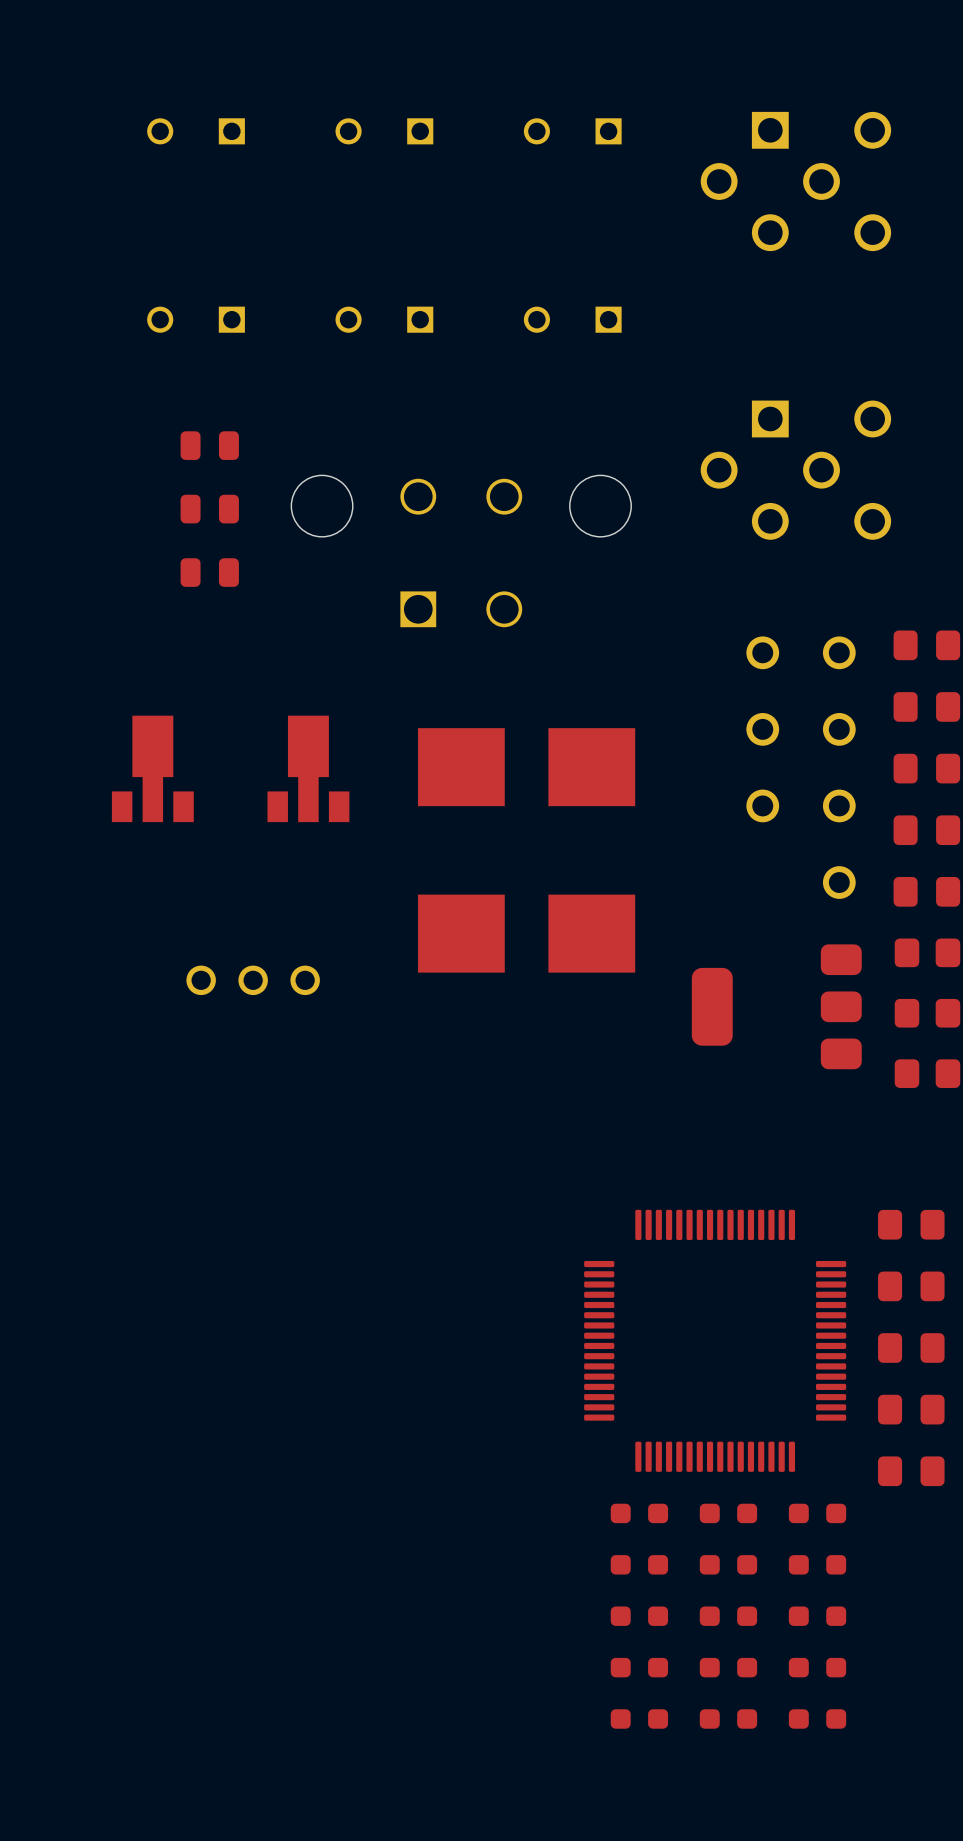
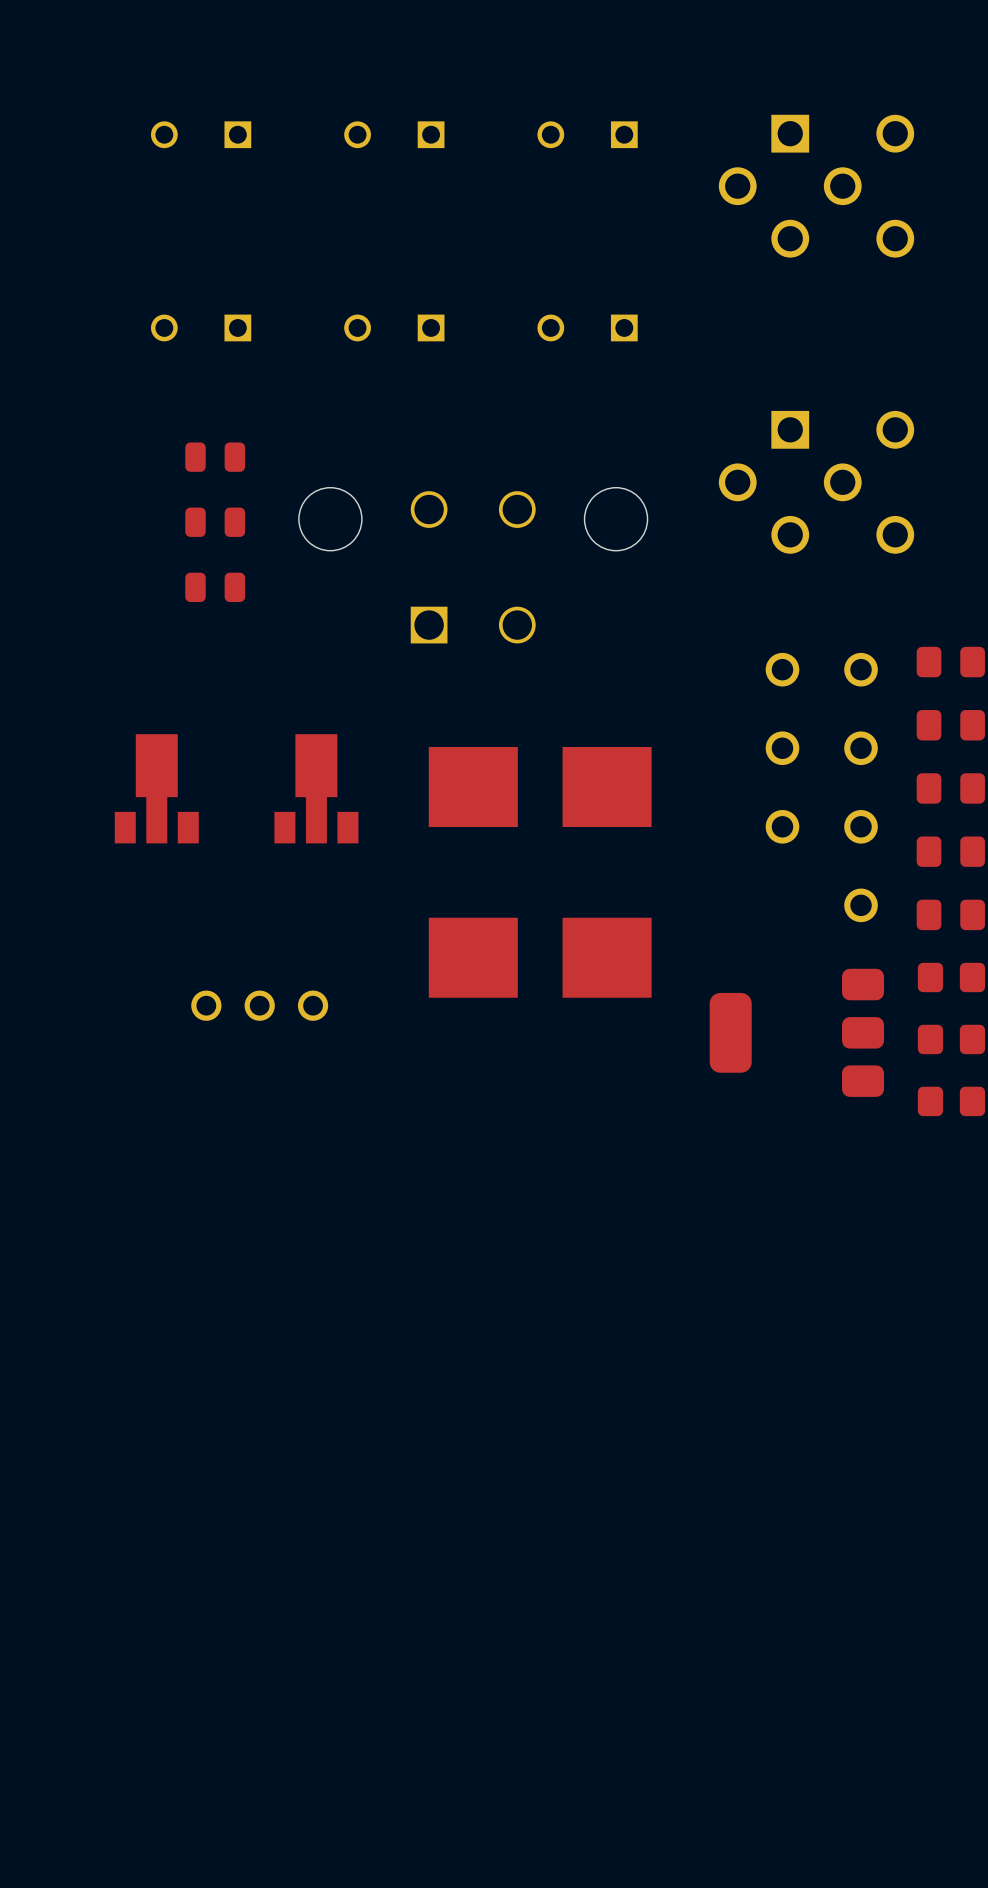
part: (911, 1224) -> none
part: (911, 1286) -> none
part: (715, 1340) -> none
part: (911, 1348) -> none
part: (911, 1409) -> none
part: (911, 1471) -> none
part: (639, 1513) -> none
part: (728, 1513) -> none
part: (817, 1513) -> none
part: (639, 1564) -> none
part: (728, 1564) -> none
part: (817, 1564) -> none
part: (639, 1616) -> none
part: (728, 1616) -> none
part: (817, 1616) -> none
part: (639, 1667) -> none
part: (728, 1667) -> none
part: (817, 1667) -> none
part: (639, 1718) -> none
part: (728, 1718) -> none
part: (817, 1718) -> none

